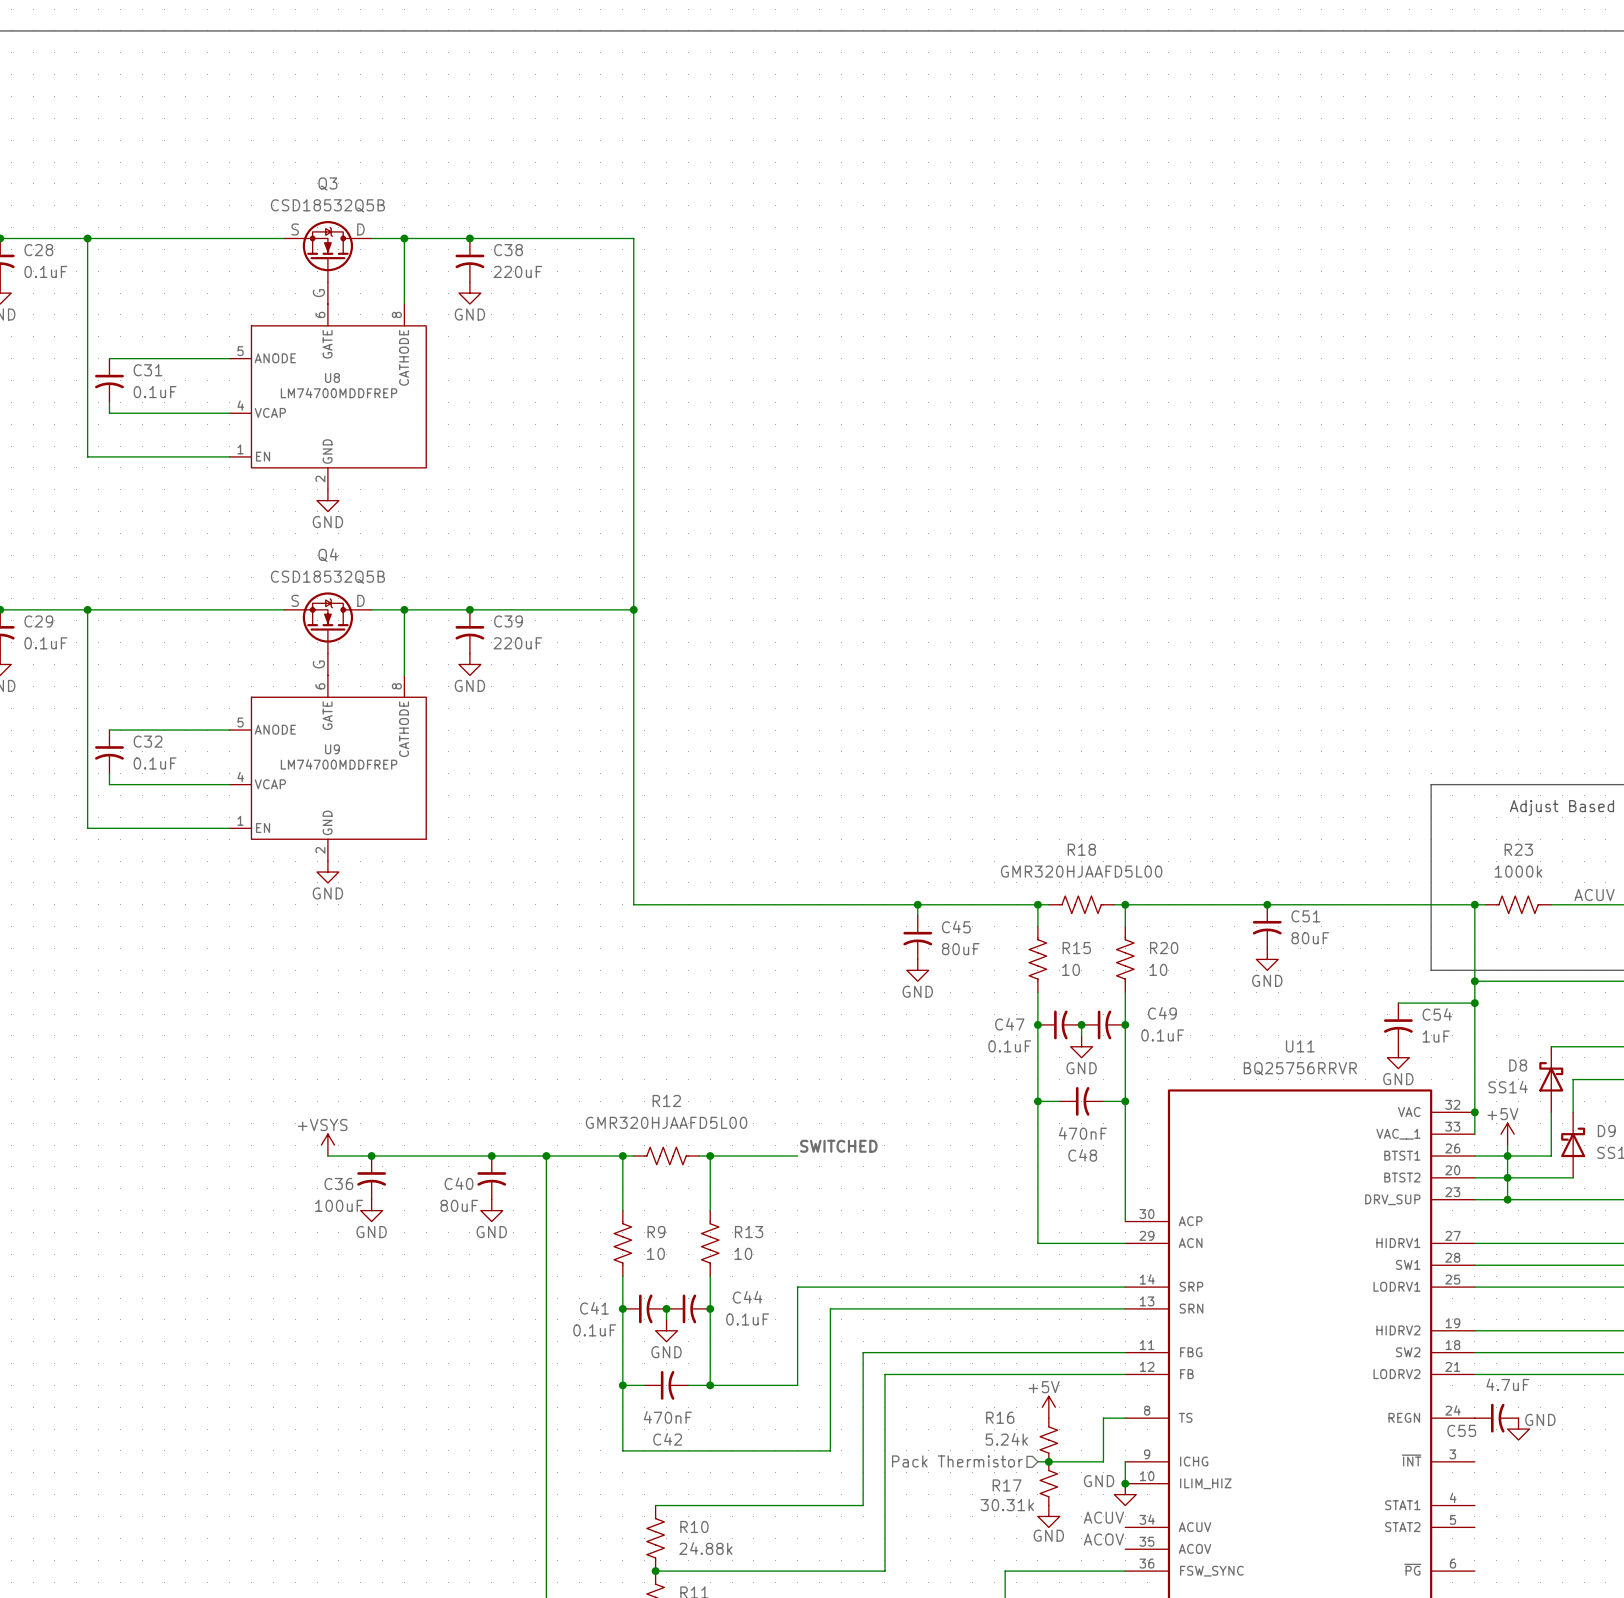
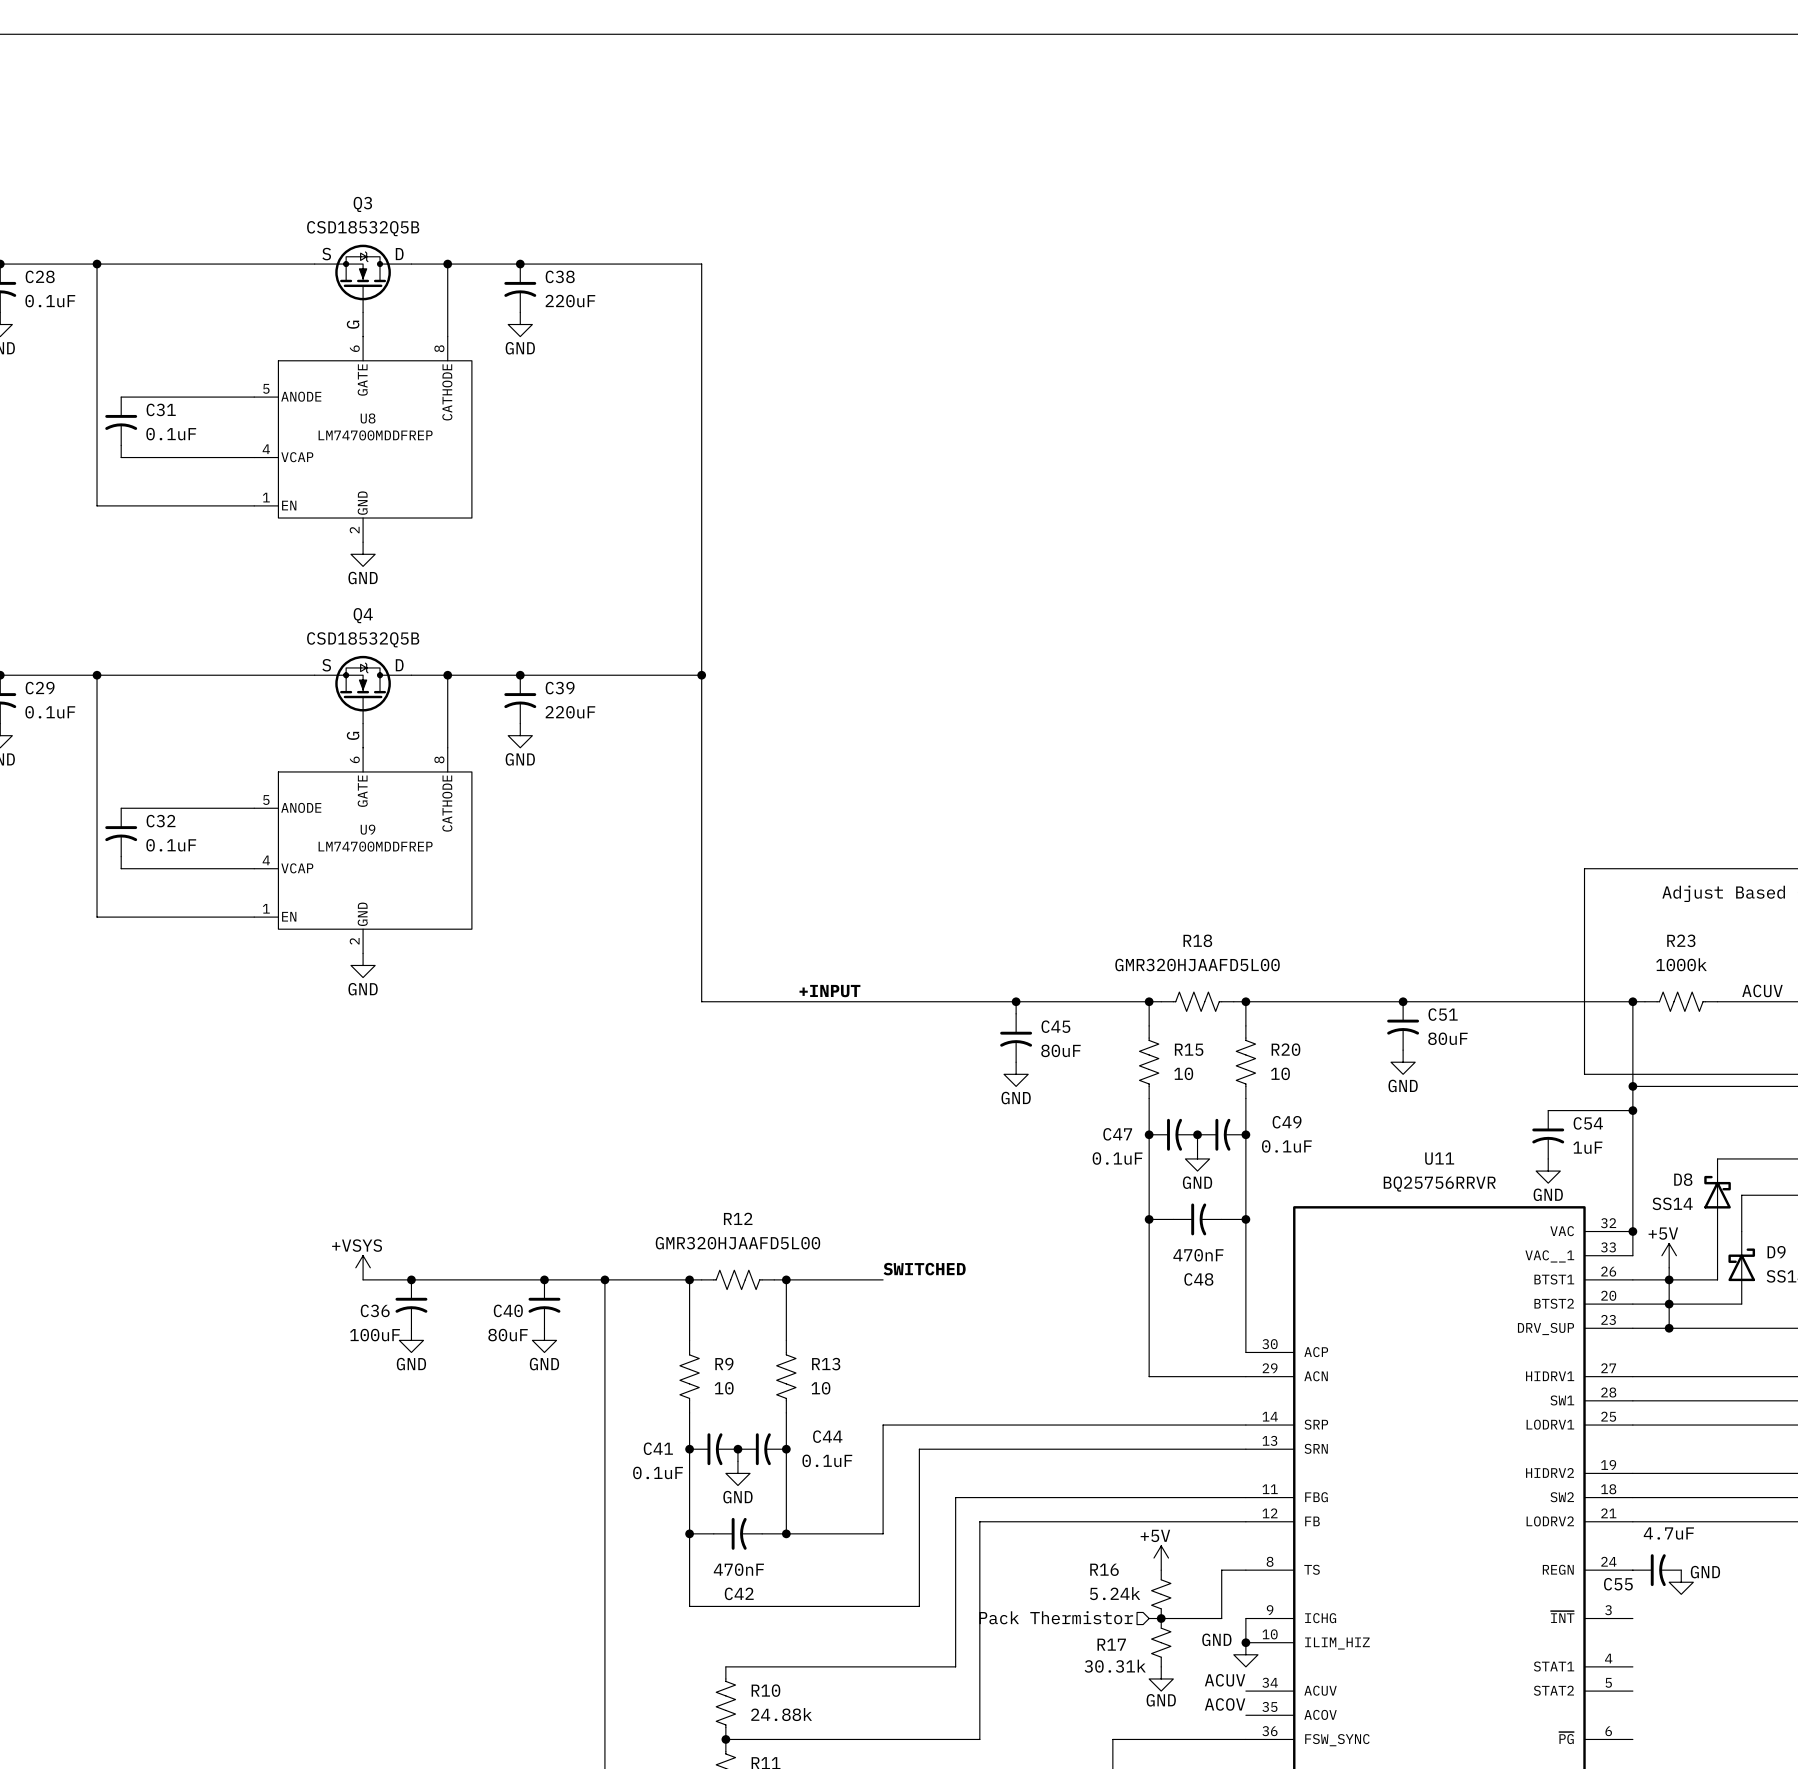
label: none -> +INPUT (829, 991)

